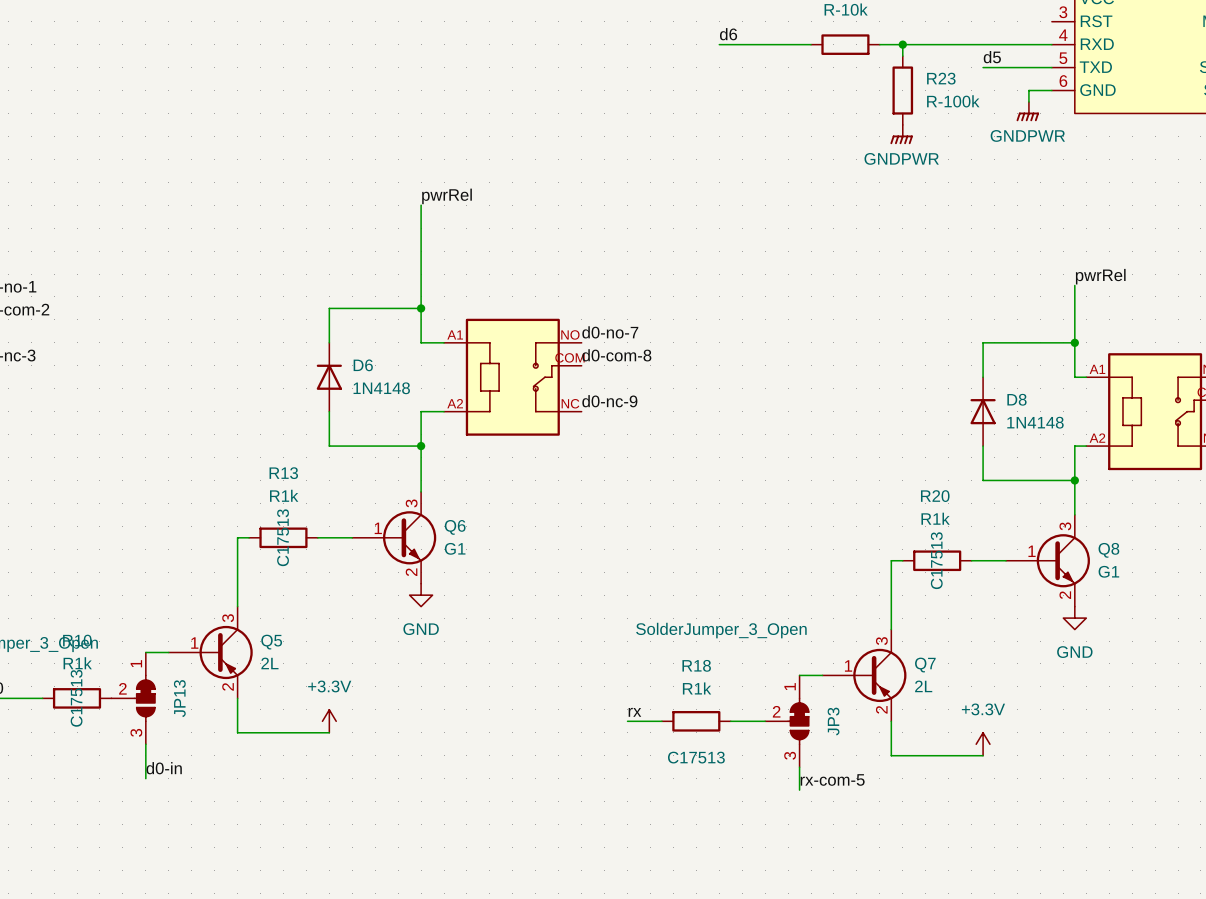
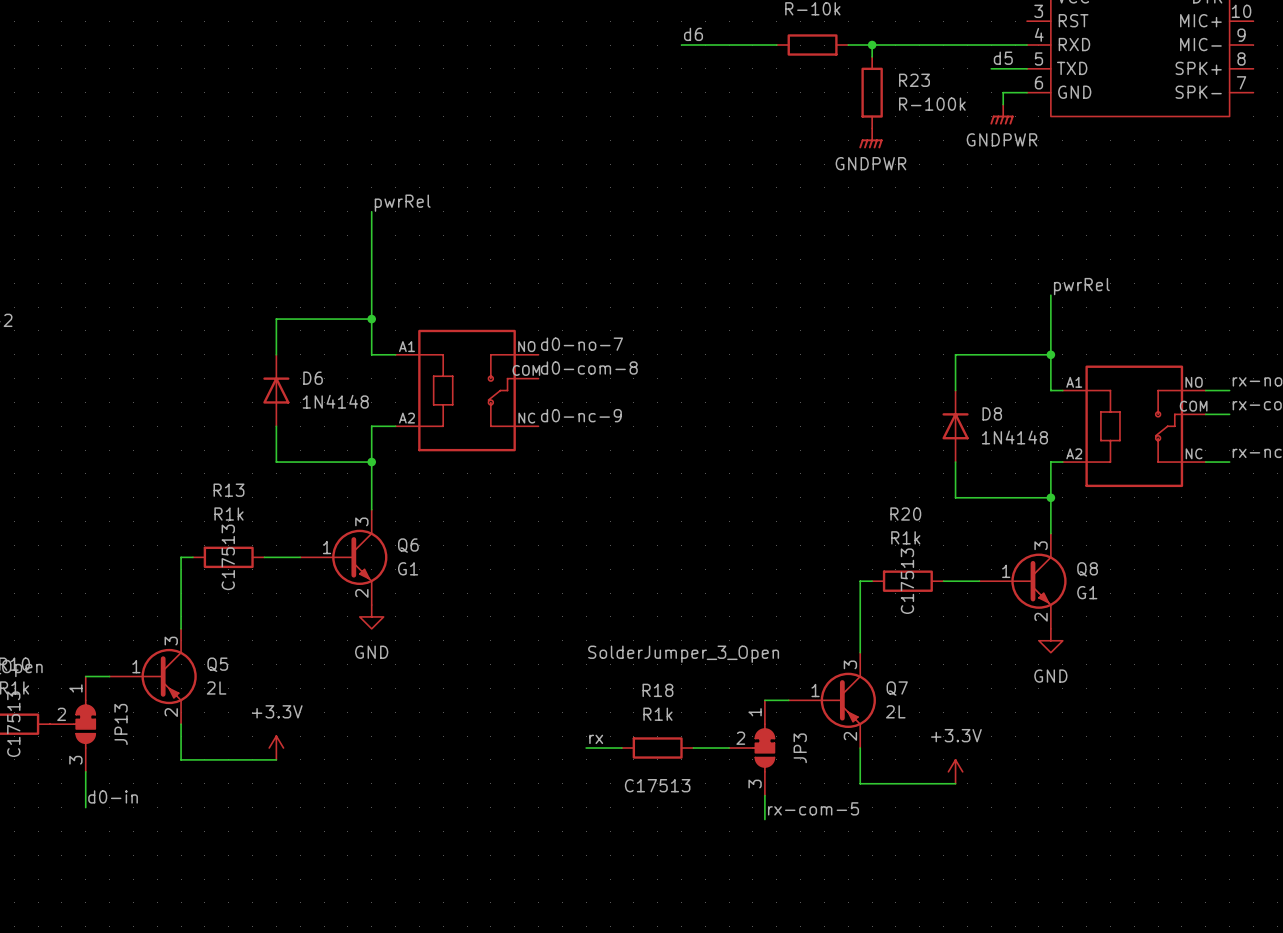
label position: d5 (992, 57) -> d5 (1003, 58)
wire: (983, 67) (1017, 67) -> none

